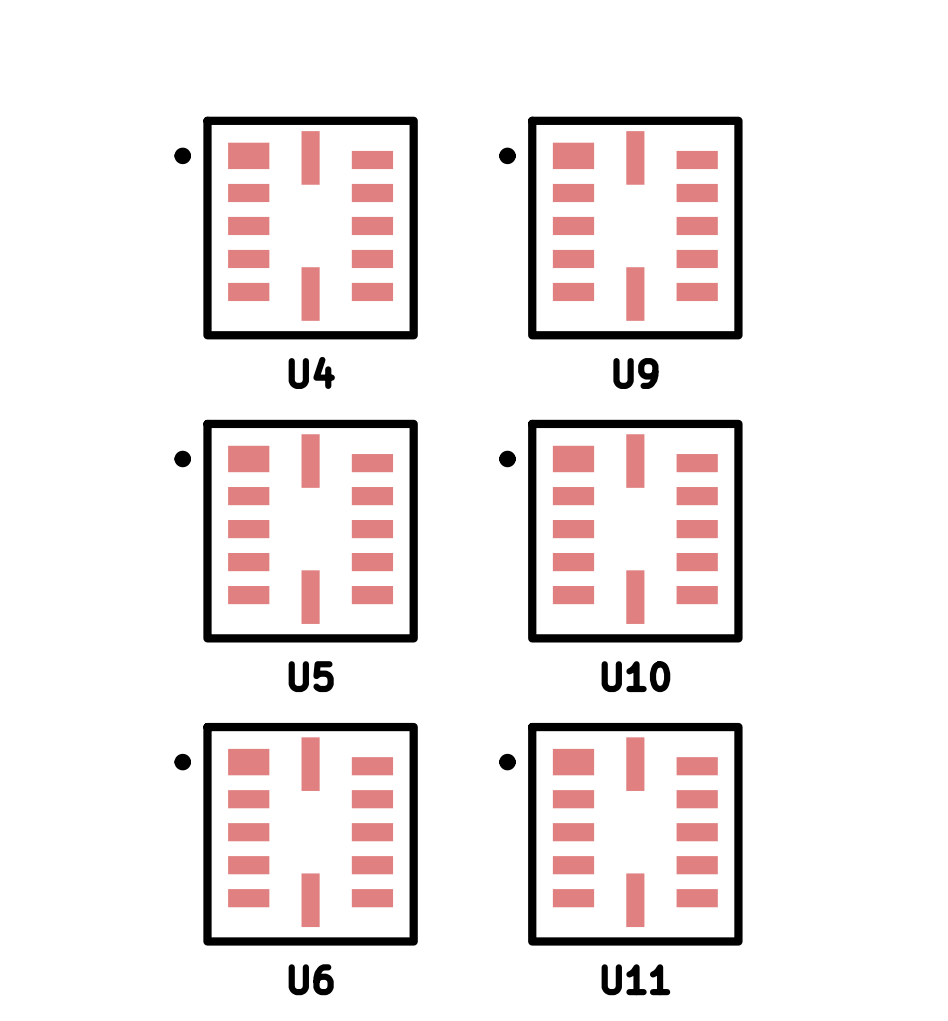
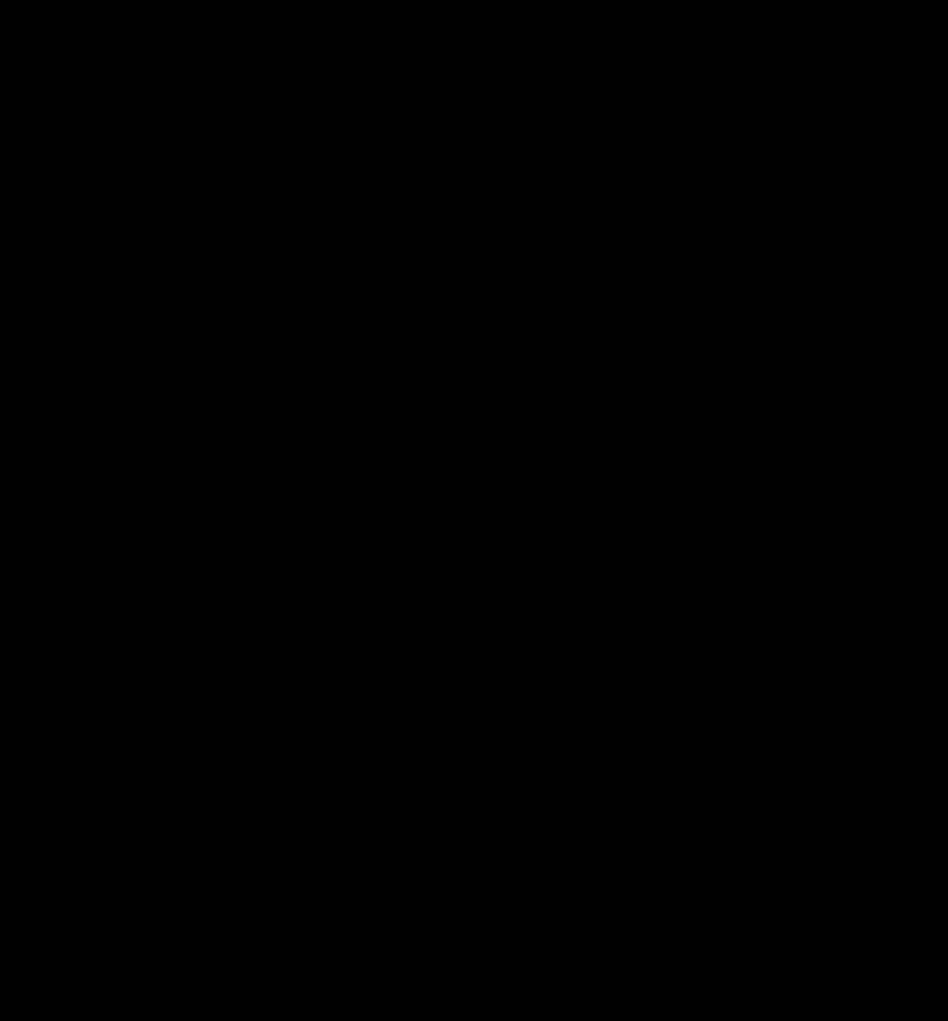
U4: (296, 228) -> none
U9: (620, 228) -> none
U5: (296, 531) -> none
U10: (620, 531) -> none
U6: (296, 834) -> none
U11: (620, 834) -> none

